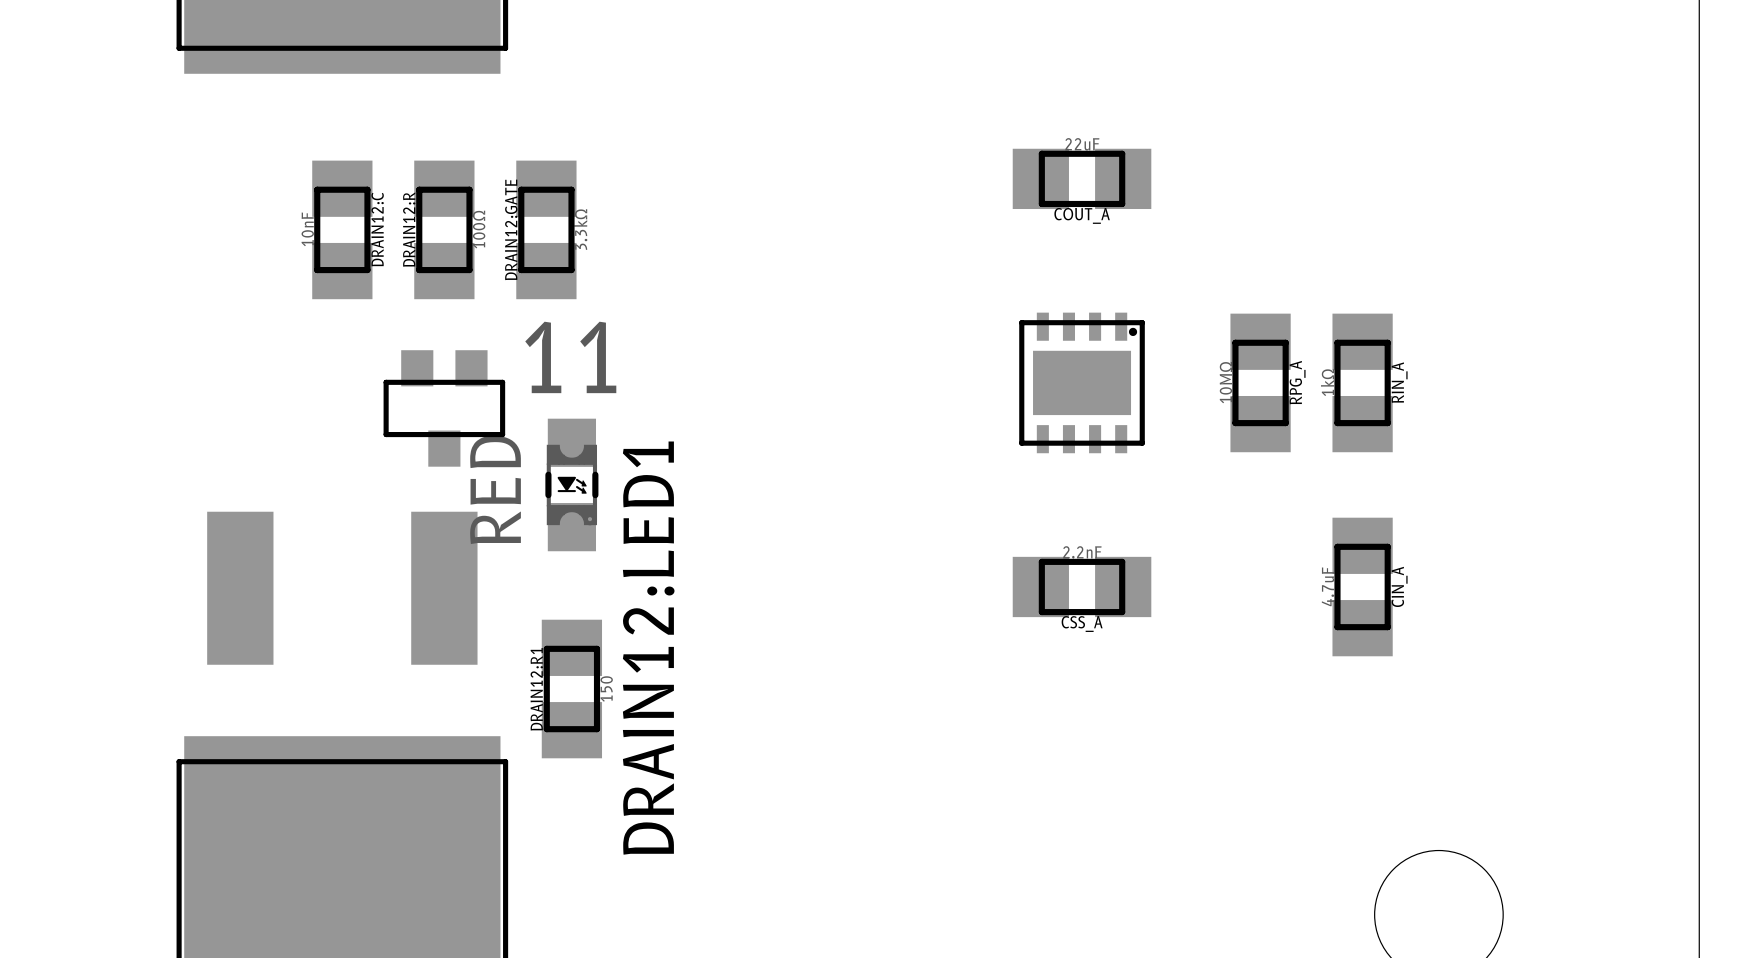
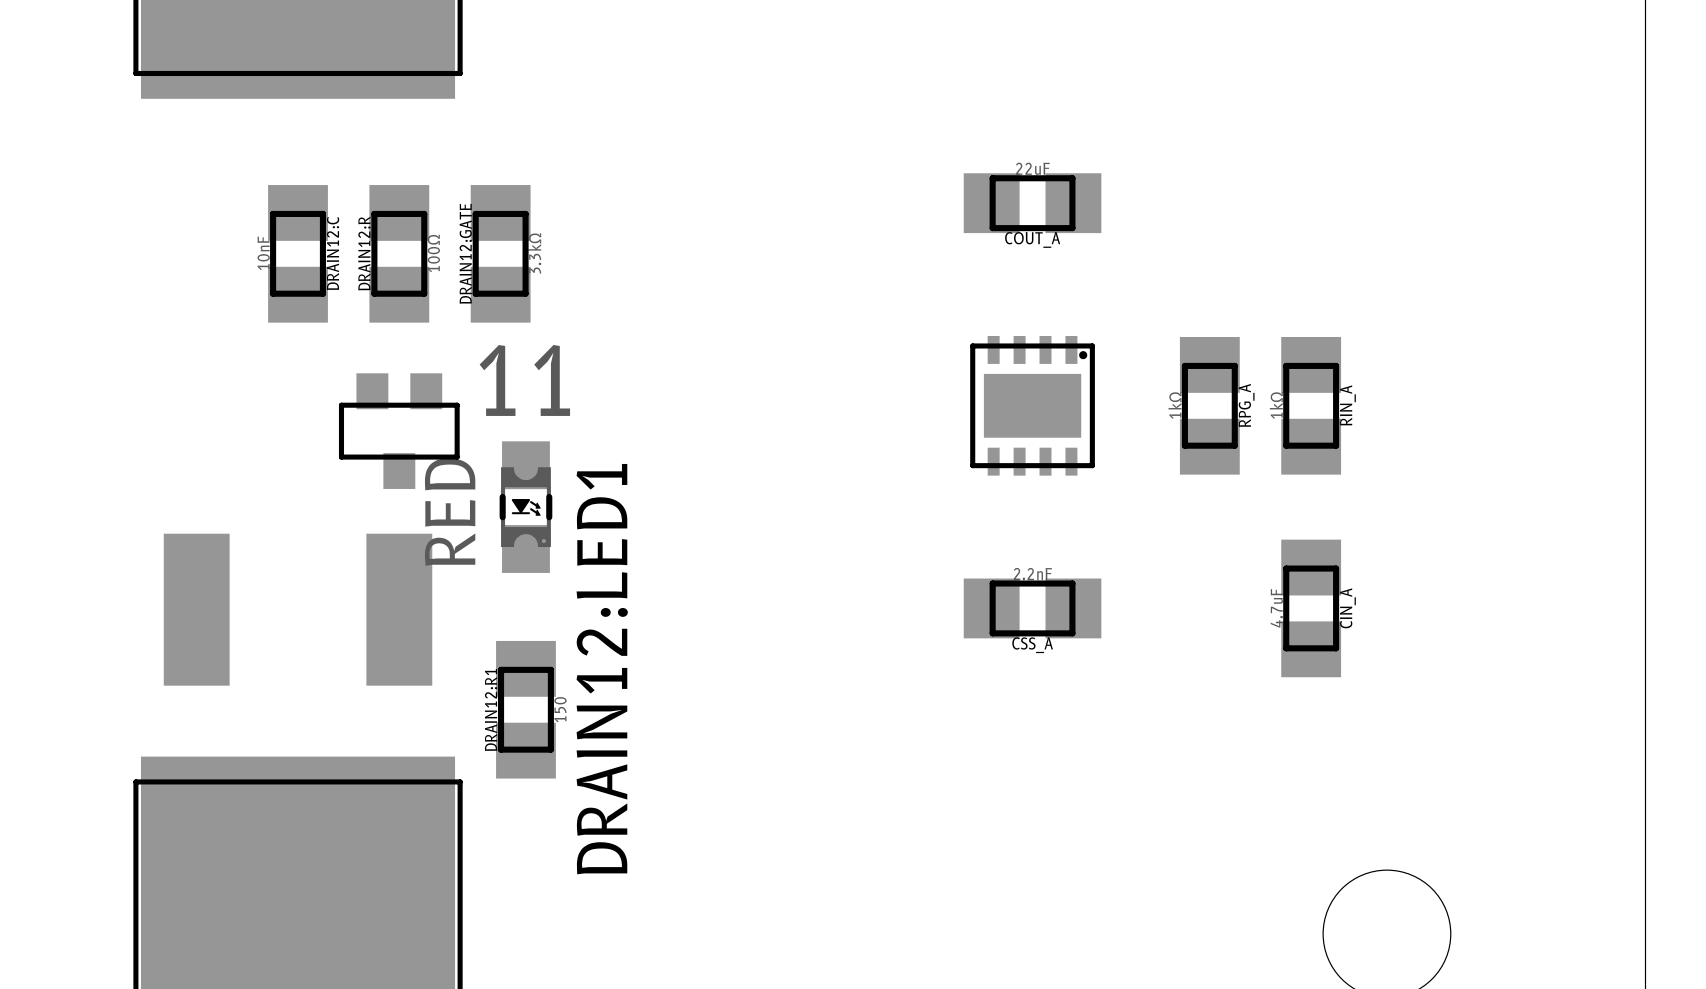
RPG_A value: 10MΩ (1225, 382) -> 1kΩ (1175, 405)

